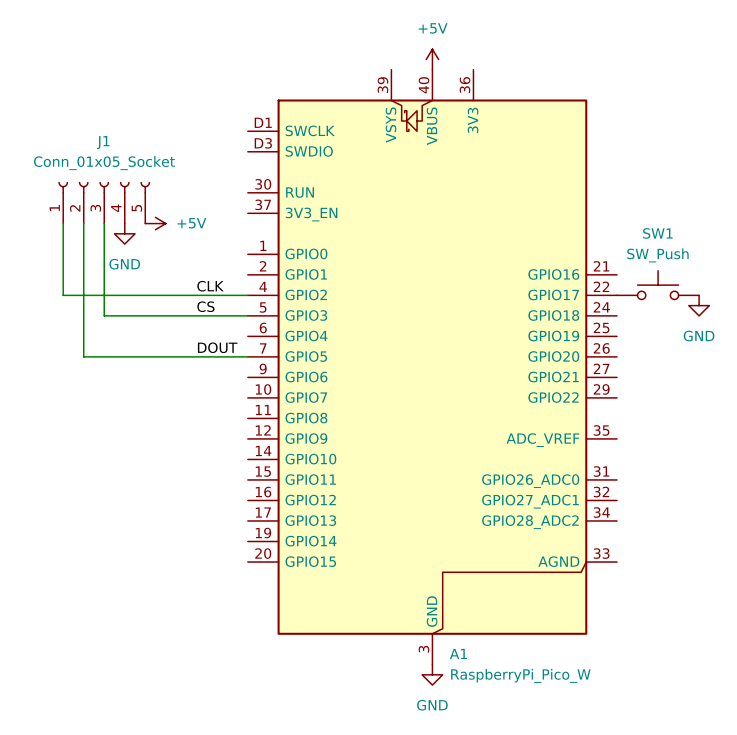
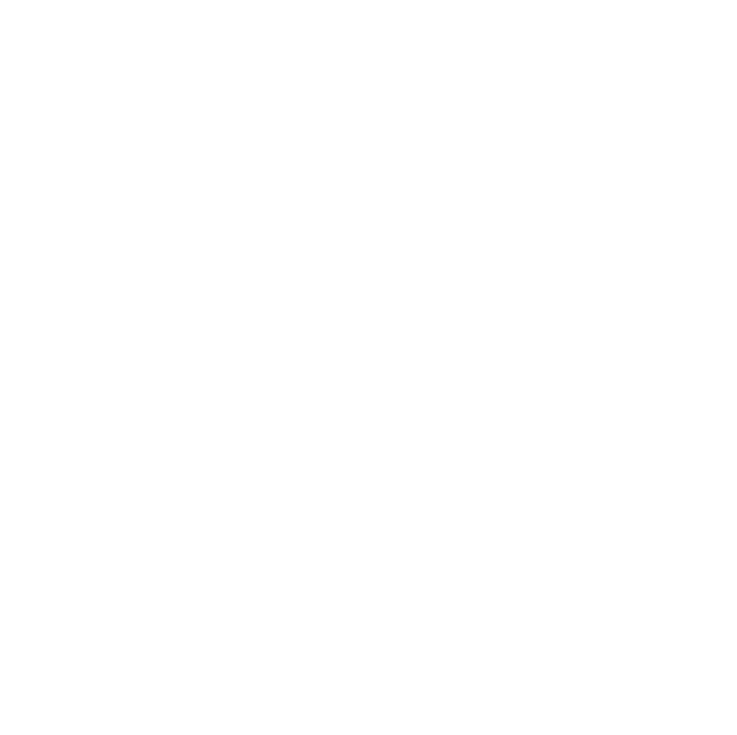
power symbol: +5V (432, 59) -> none
J1: Conn_01x05_Socket (104, 202) -> none
wire: (63, 223) (63, 295) (247, 295) -> none
wire: (83, 223) (83, 356) (247, 356) -> none
wire: (104, 223) (104, 315) (247, 315) -> none
power symbol: +5V (155, 223) -> none
power symbol: GND (124, 233) -> none
SW1: SW_Push (658, 285) -> none
label: CLK (210, 286) -> none
power symbol: GND (699, 305) -> none
label: CS (205, 306) -> none
label: DOUT (217, 347) -> none
A1: RaspberryPi_Pico_W (432, 367) -> none
power symbol: GND (432, 674) -> none

